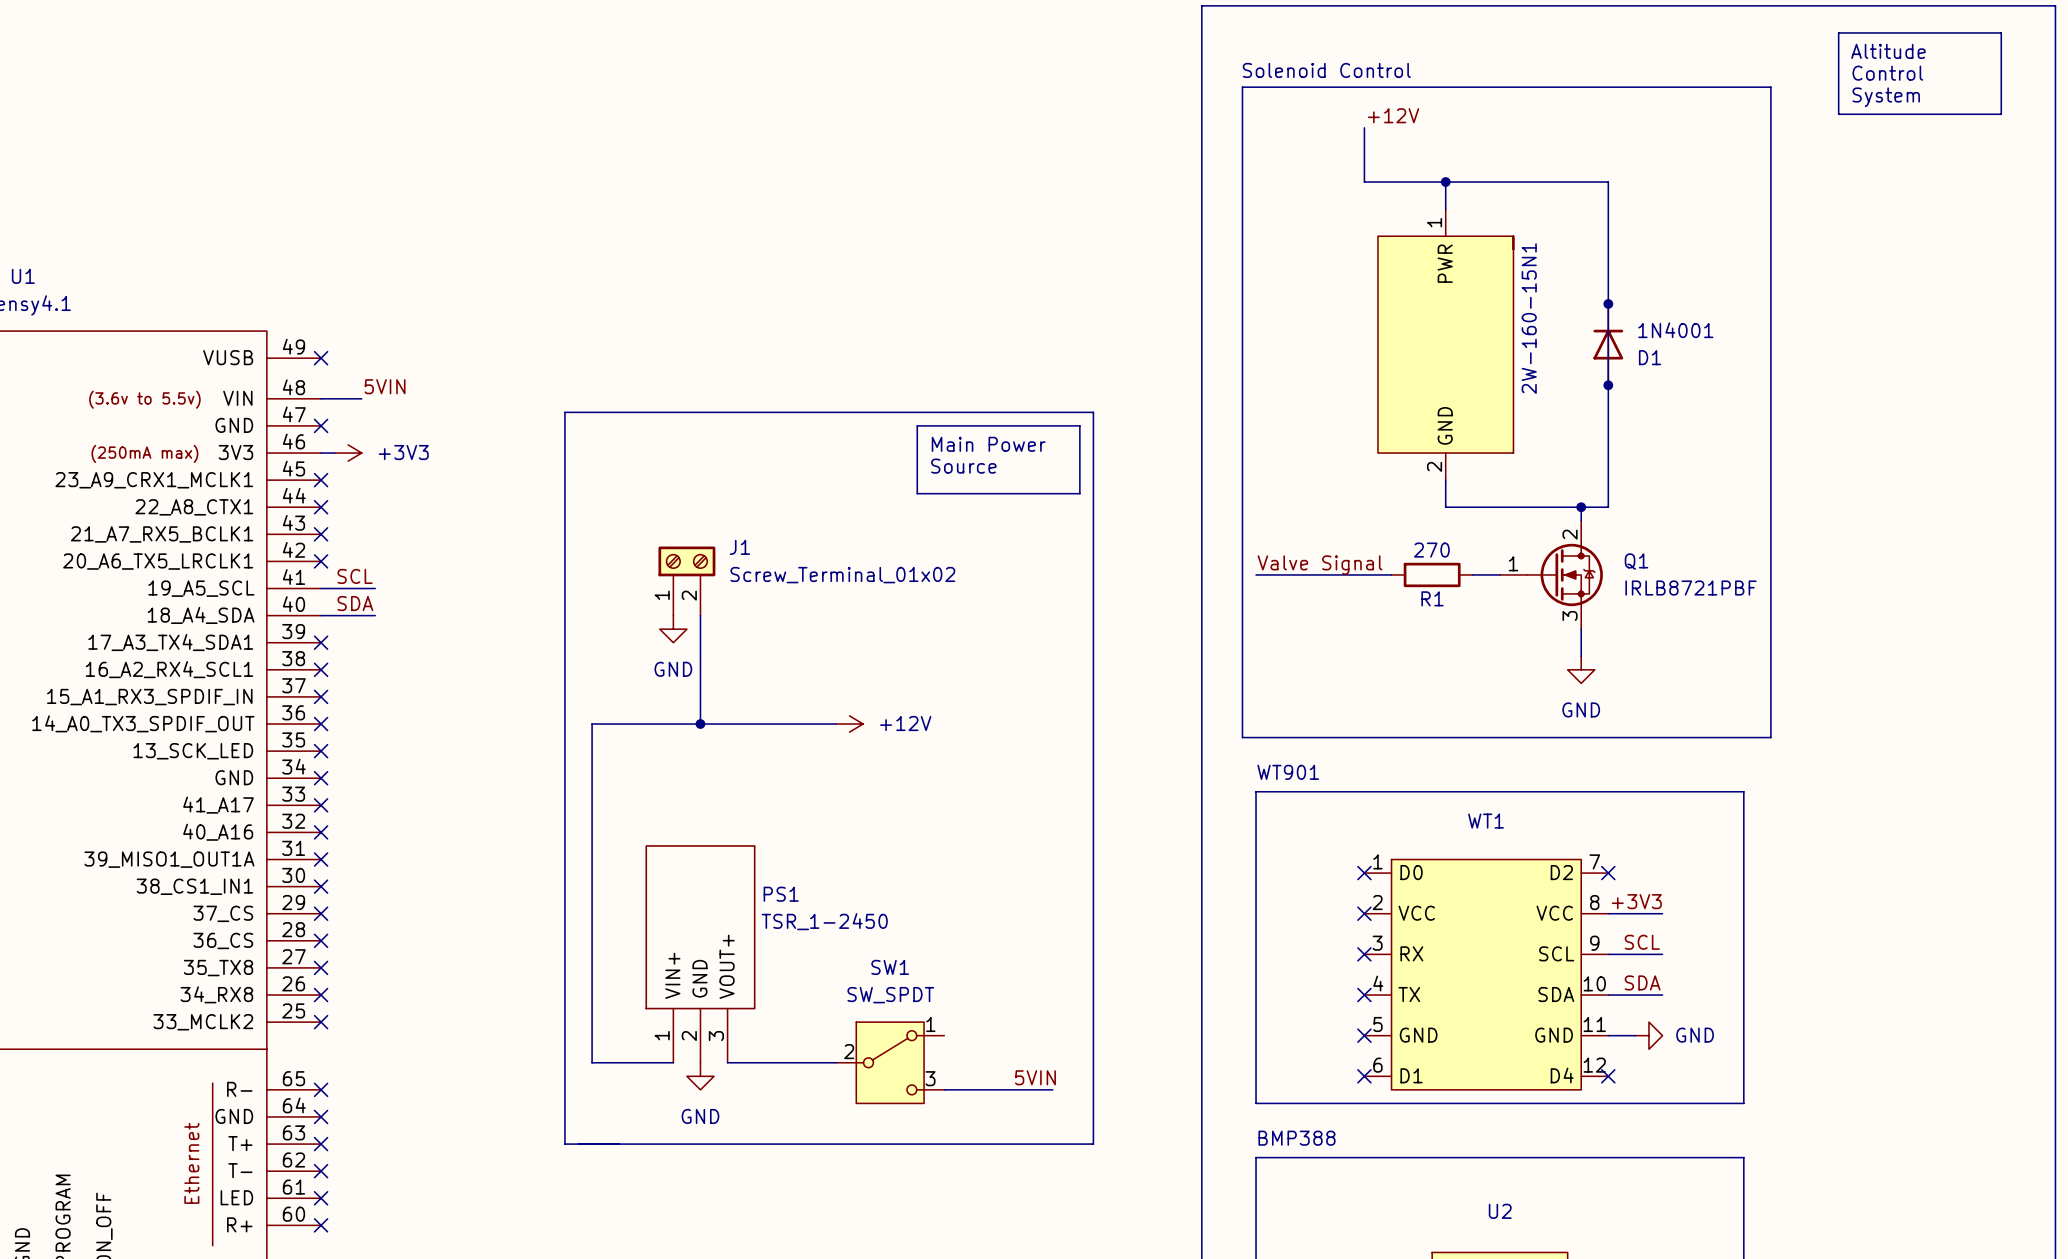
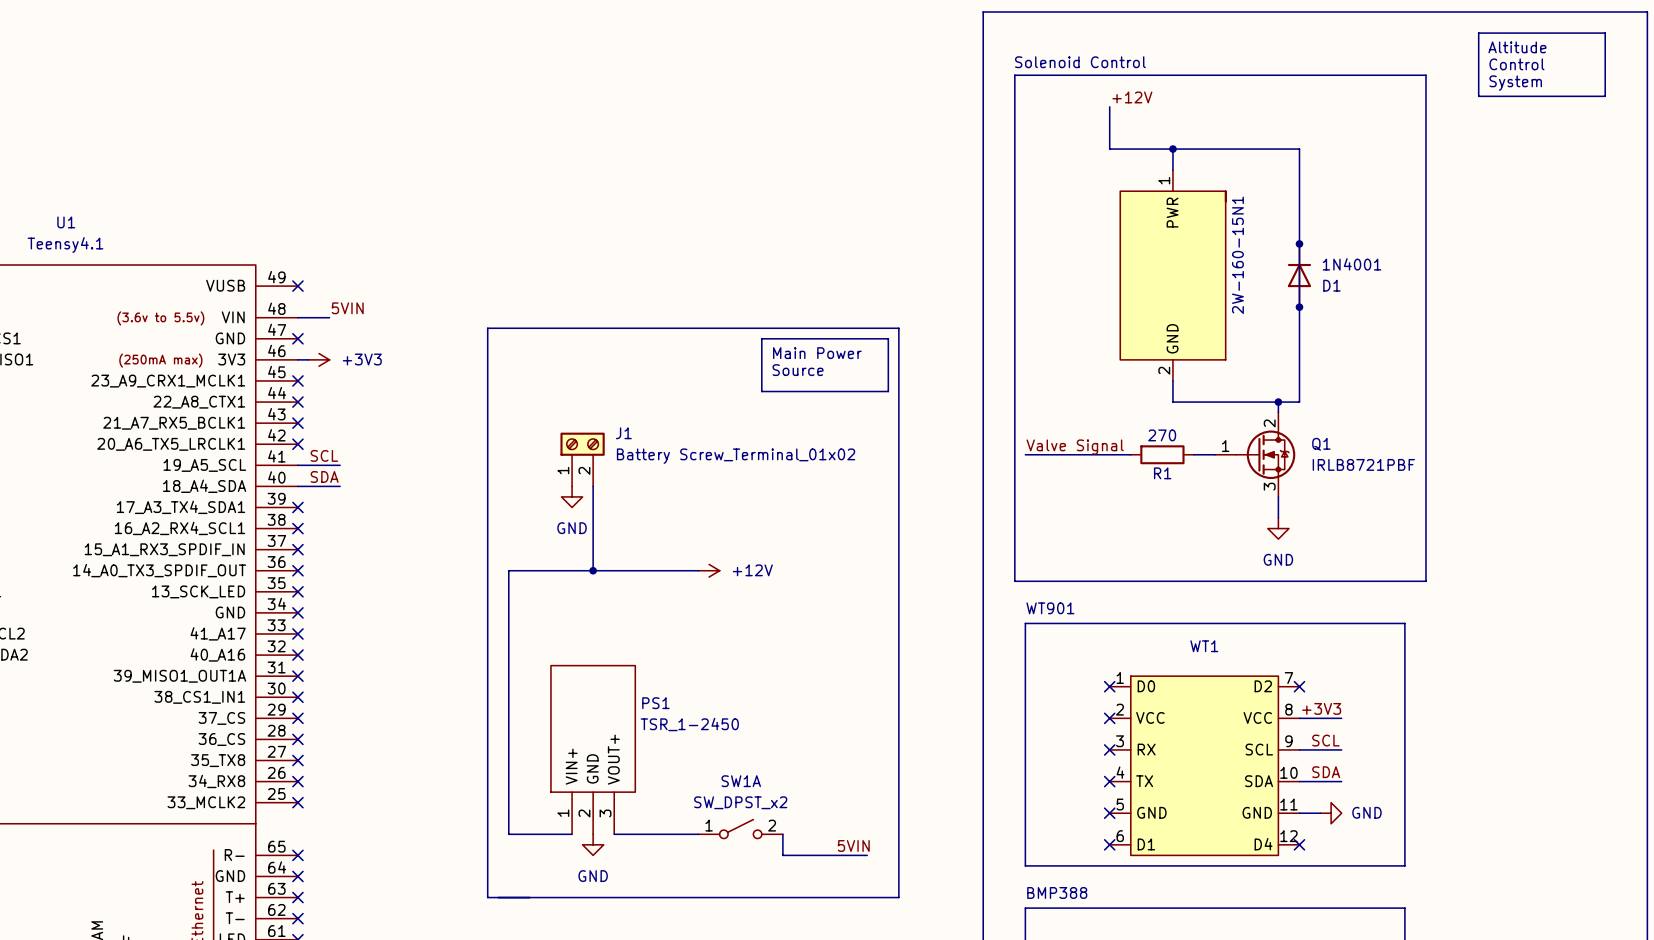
J1 value: Screw_Terminal_01x02 (842, 575) -> Battery Screw_Terminal_01x02 (736, 456)
SW1A: none -> SW_DPST_x2 (740, 829)
SW1: SW_SPDT (890, 1062) -> none
wire: none -> (782, 834) (782, 855)

